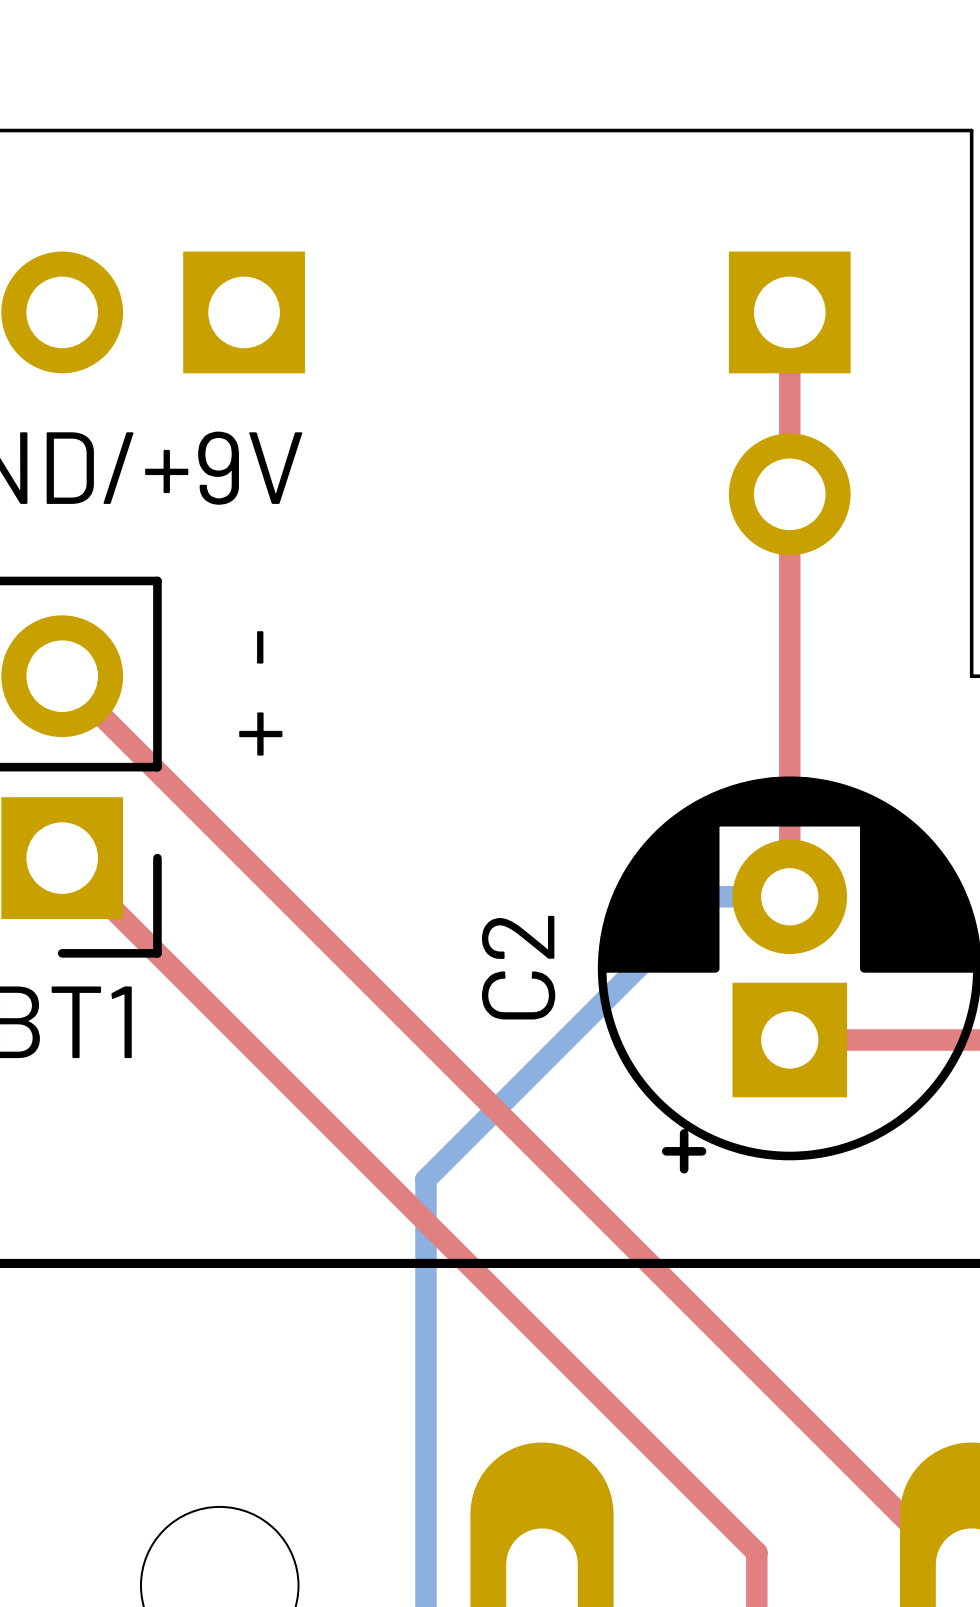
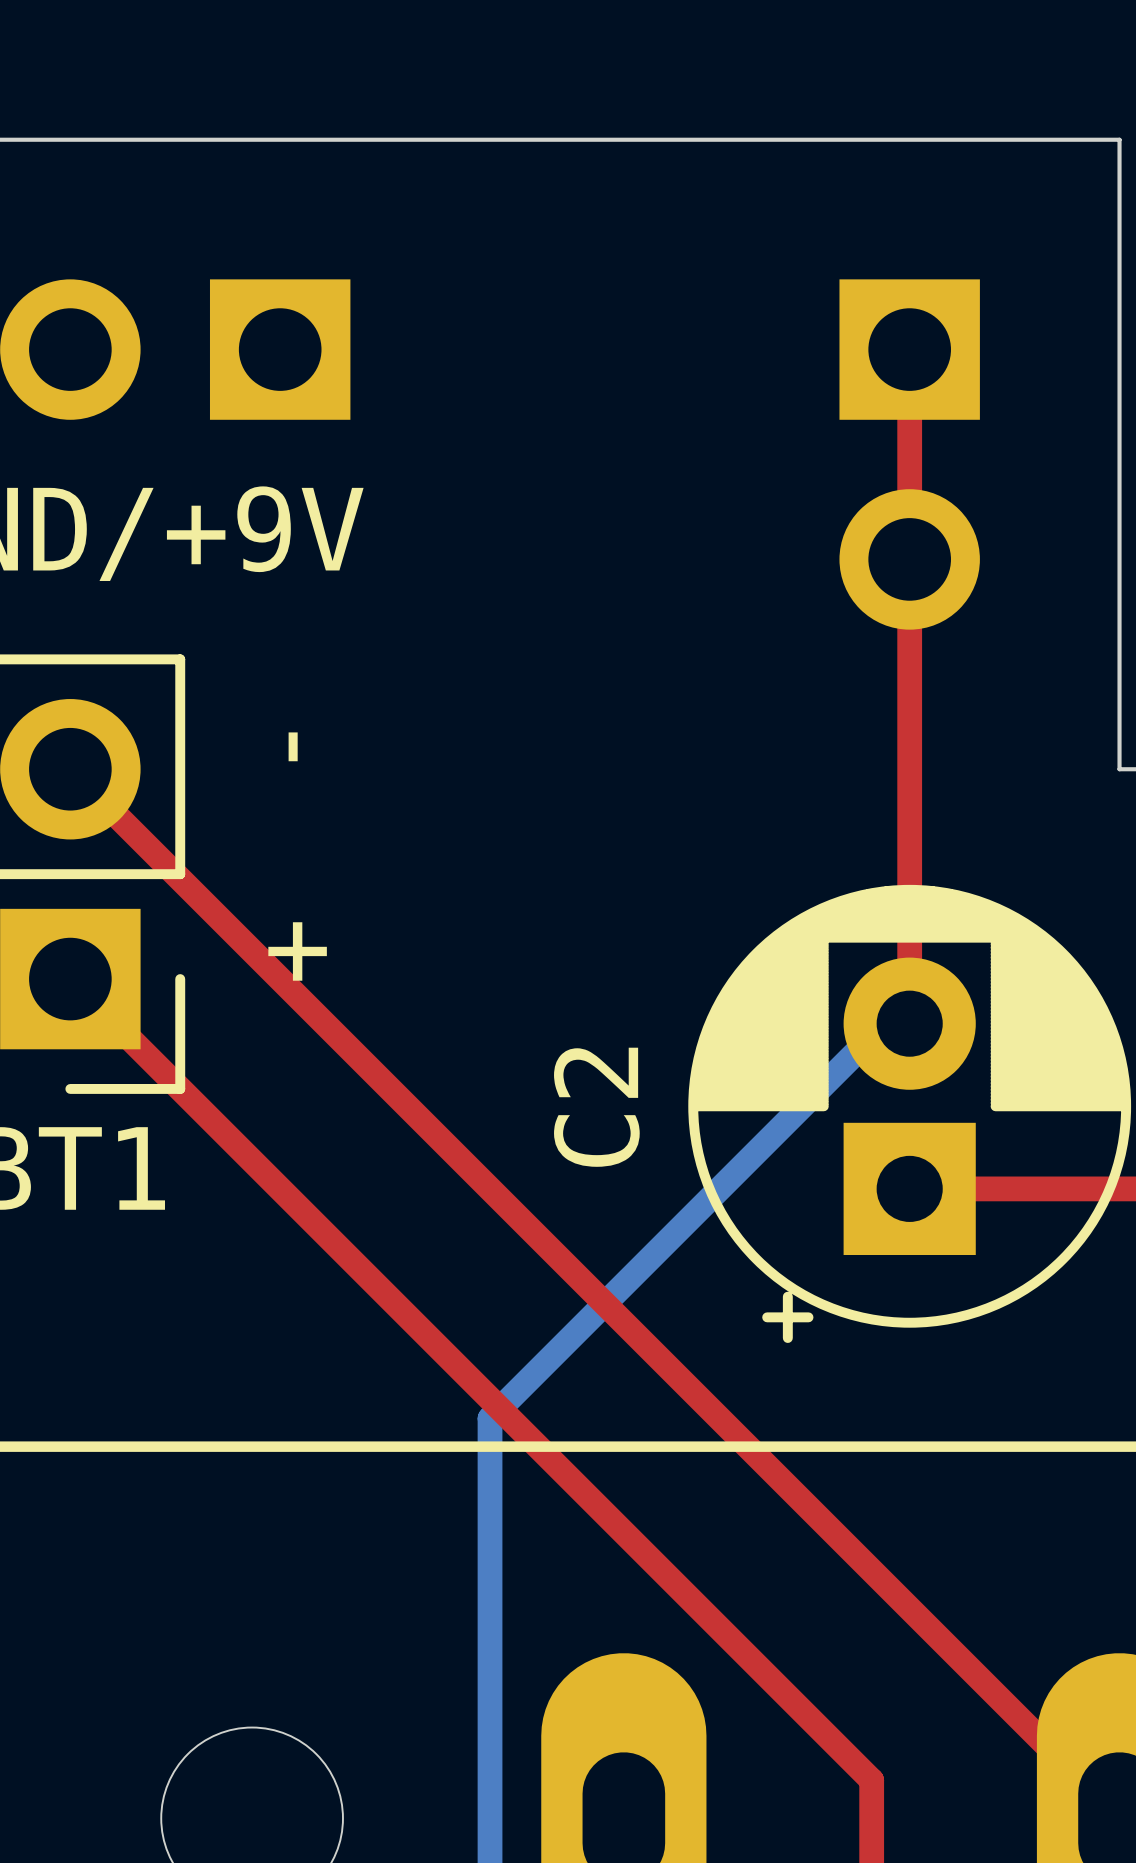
bottom track: (768, 896) (708, 896) (425, 1179) (425, 1239) -> (884, 1023) (490, 1418)

